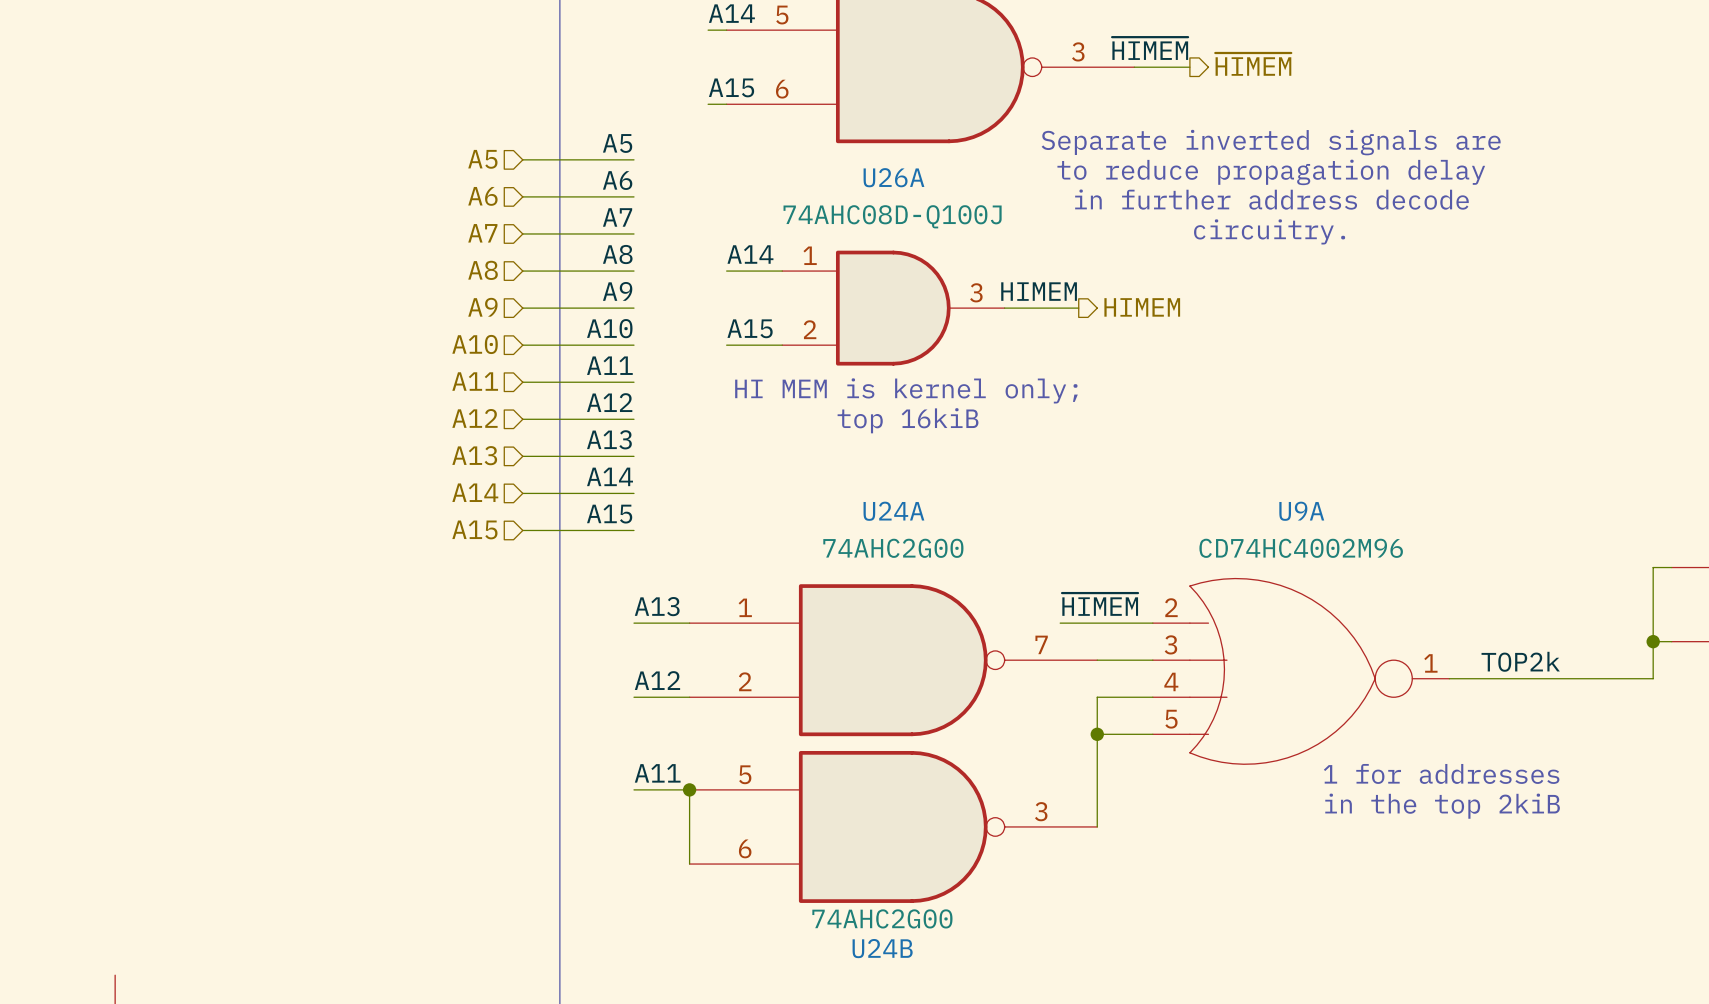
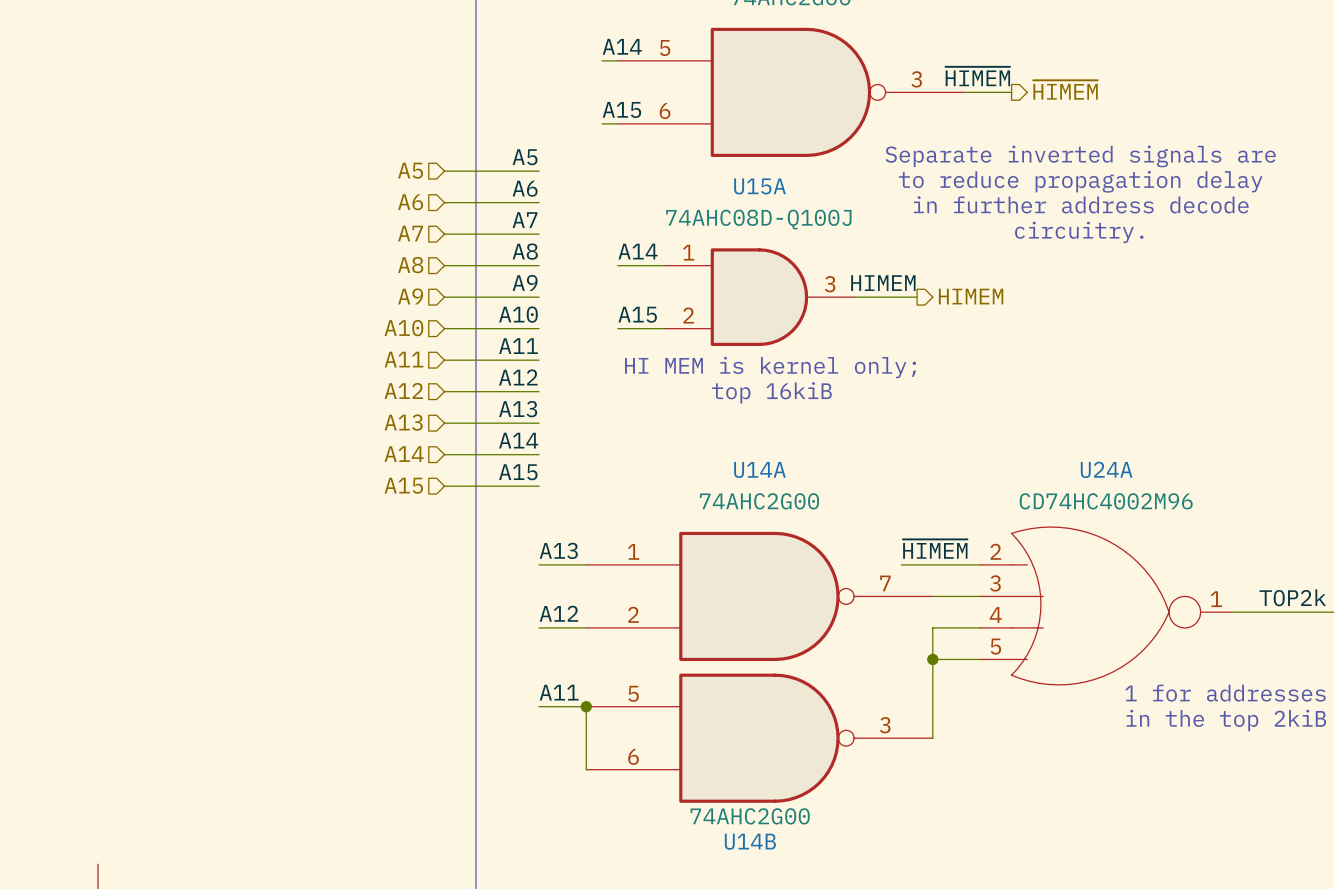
U26A name: U26A (893, 177) -> U15A (760, 186)
U24A name: U24A (893, 511) -> U14A (759, 469)
U9A name: U9A (1301, 511) -> U24A (1106, 469)
U24B name: U24B (882, 948) -> U14B (750, 841)

